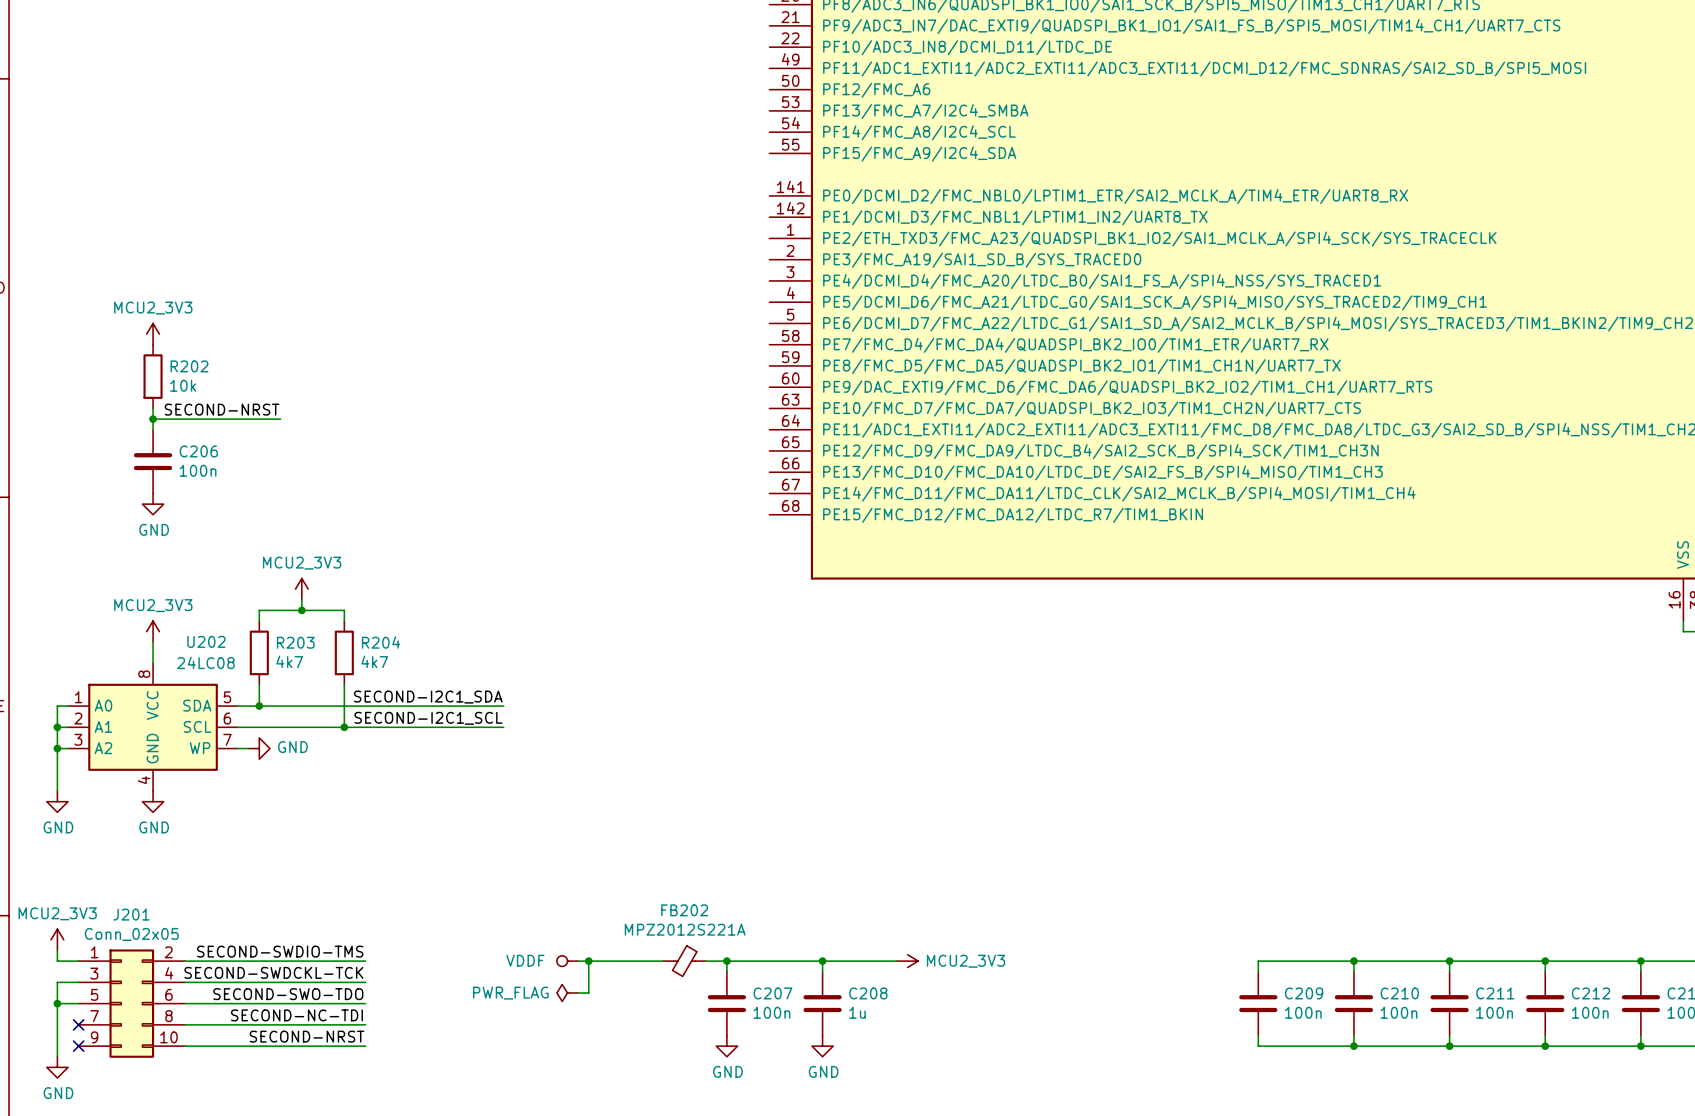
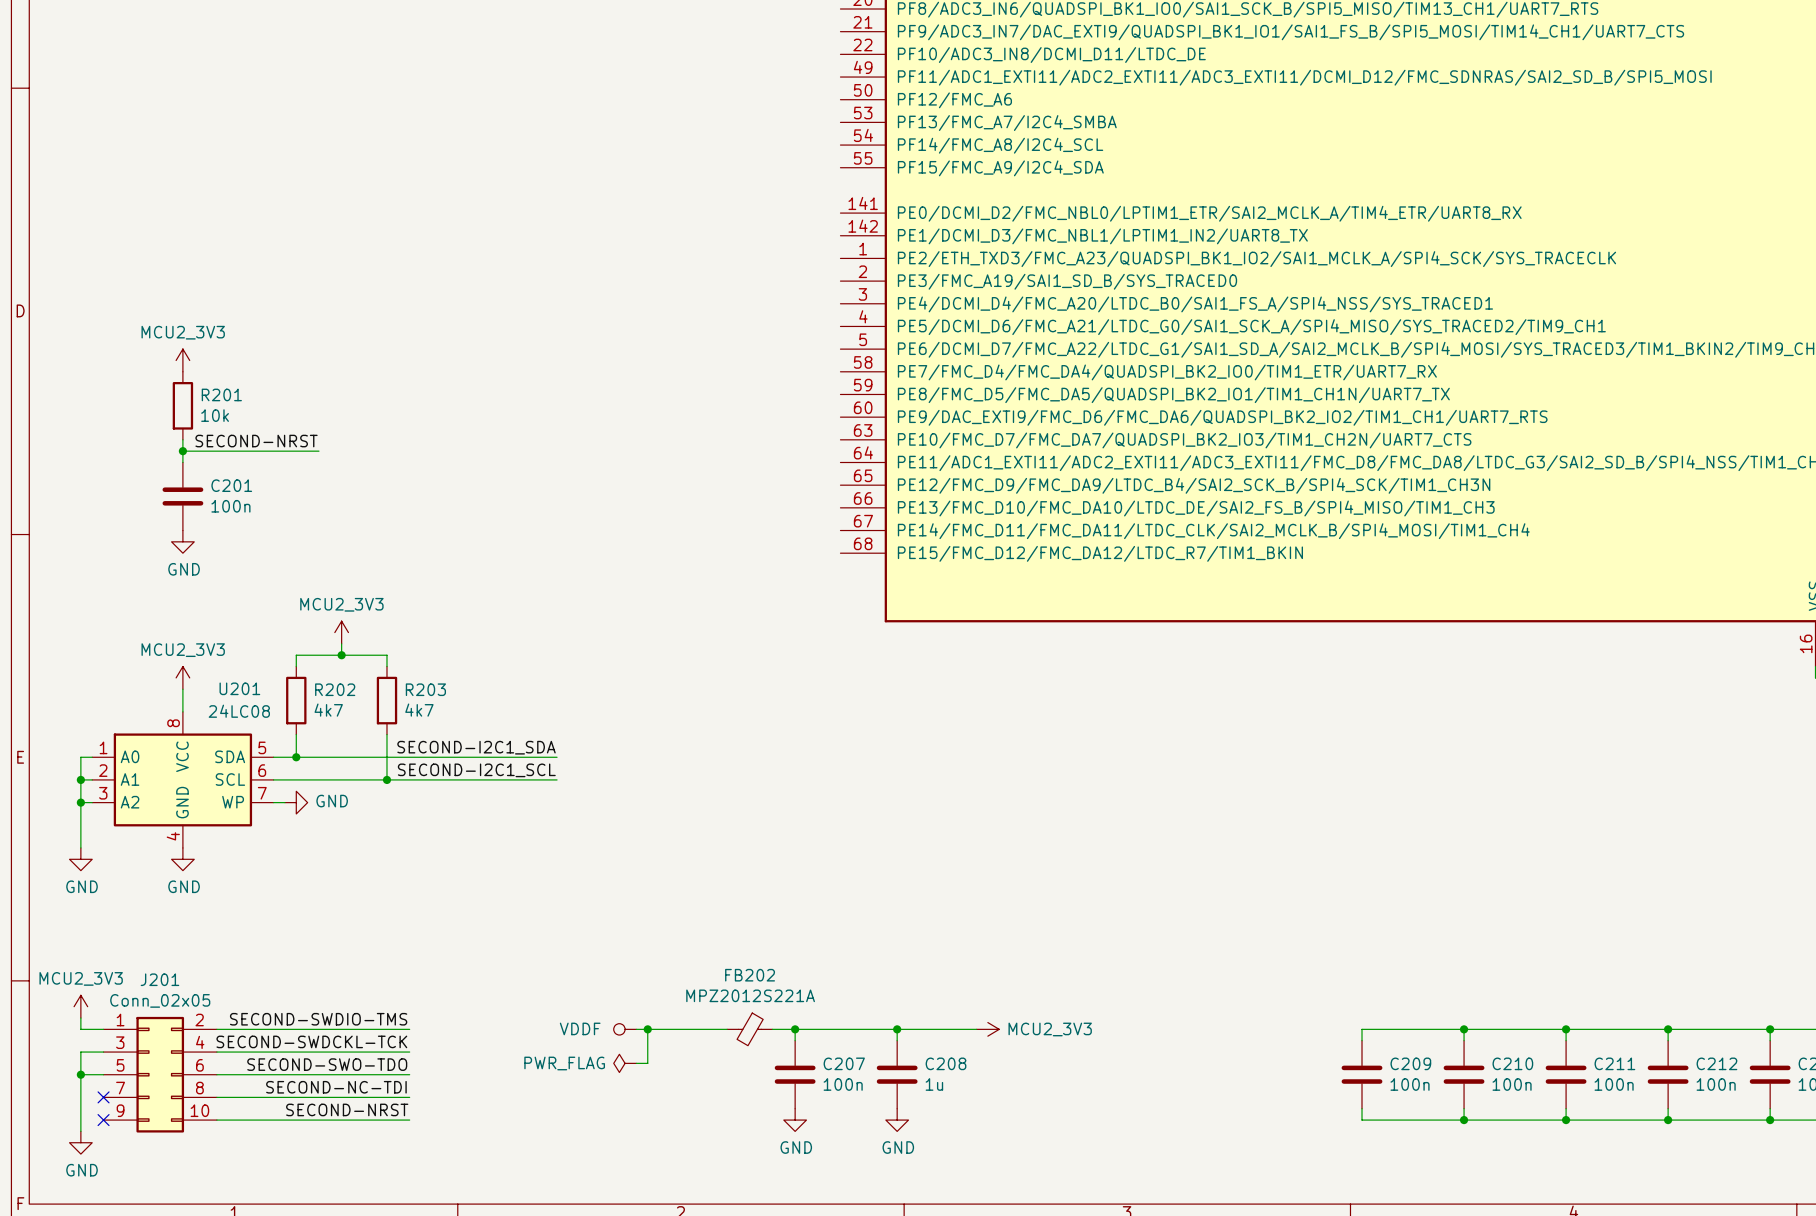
R202 name: R202 (189, 366) -> R201 (221, 394)
C206 name: C206 (198, 451) -> C201 (231, 485)
U202 name: U202 (206, 641) -> U201 (239, 688)
R203 name: R203 (295, 642) -> R202 (335, 689)
R204 name: R204 (381, 642) -> R203 (425, 689)

